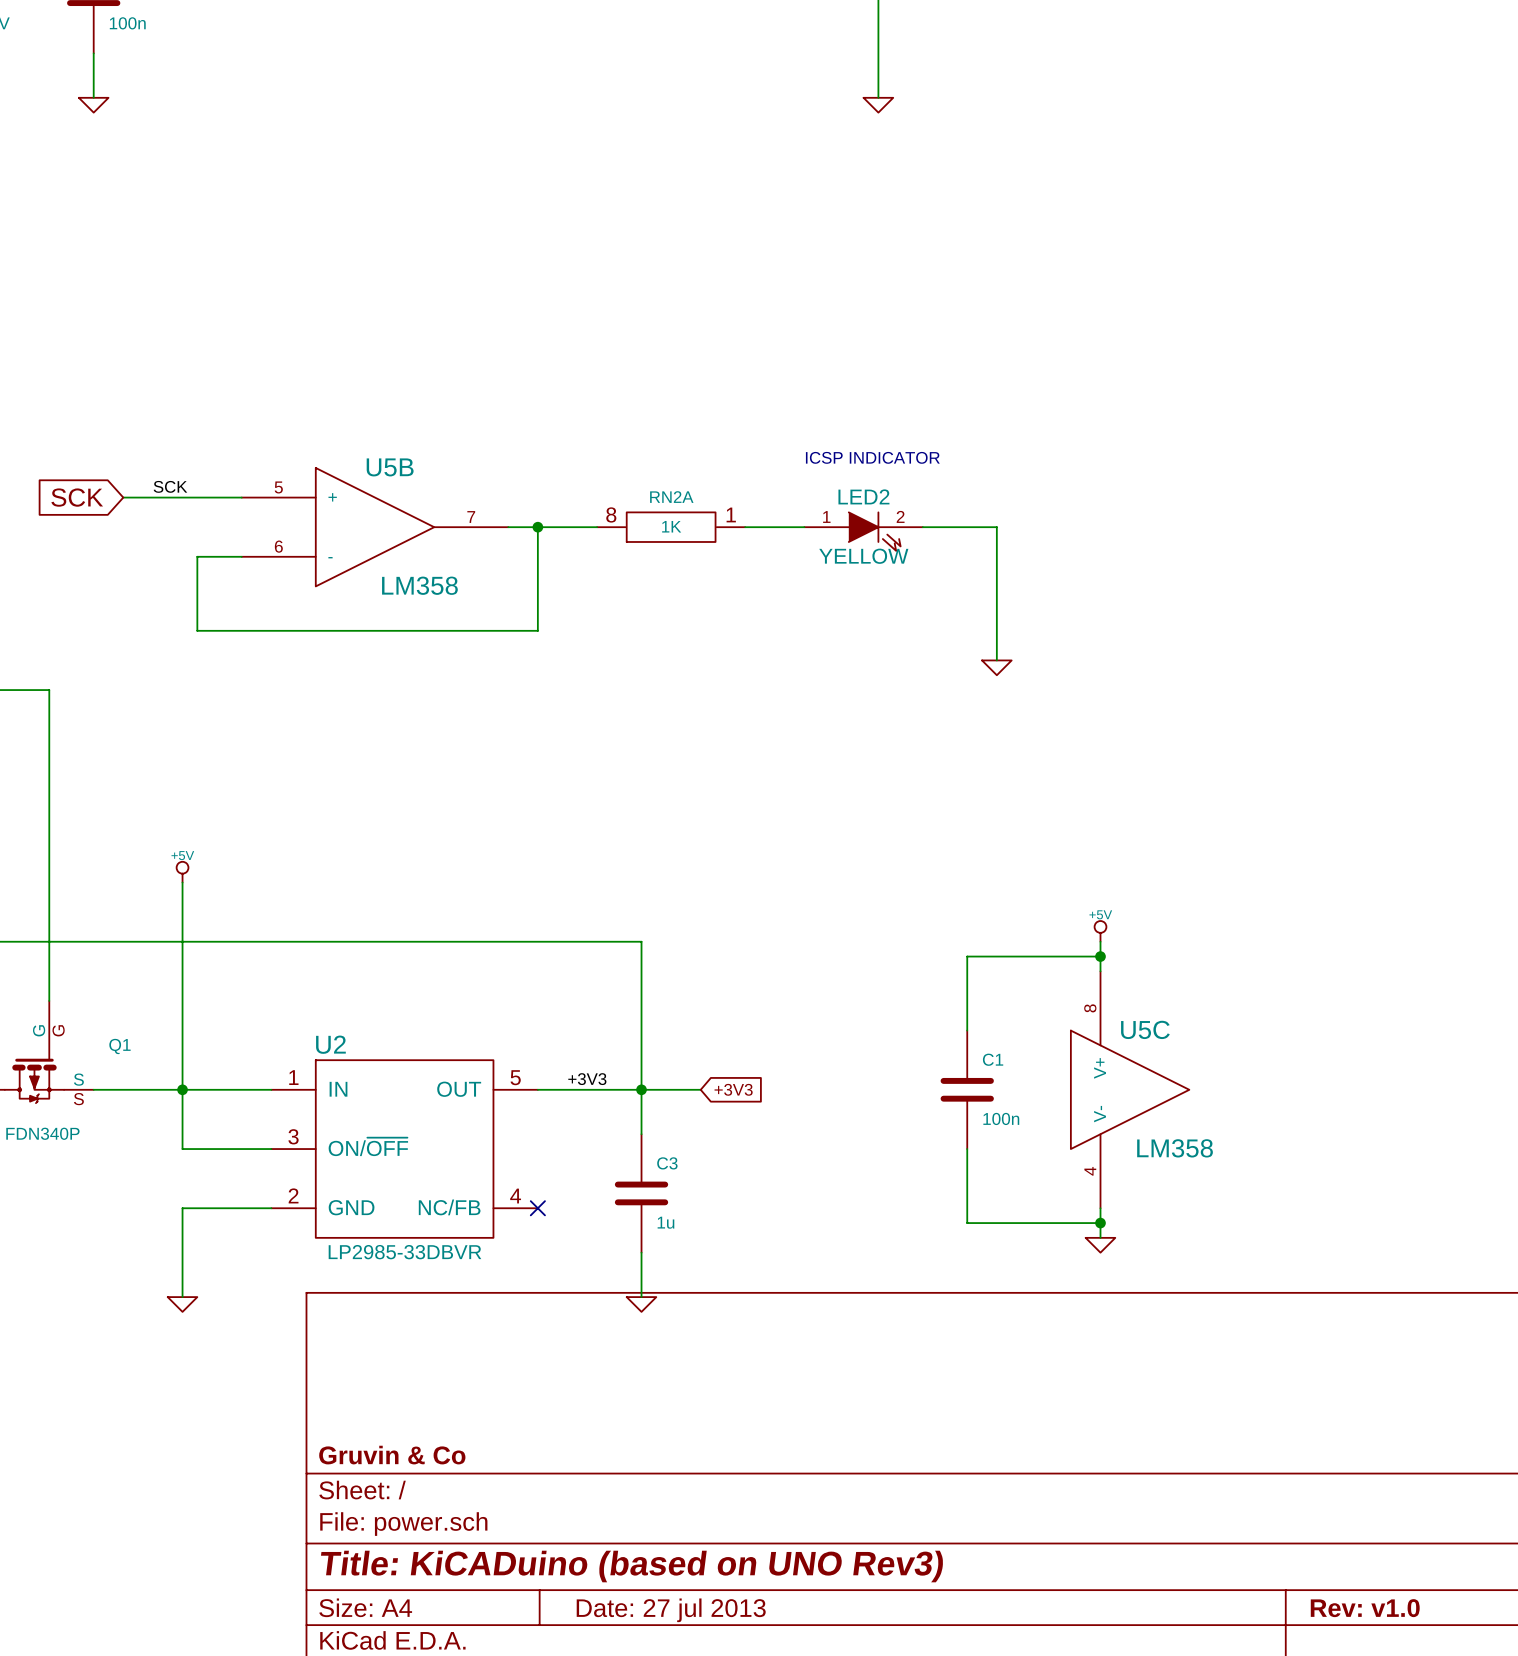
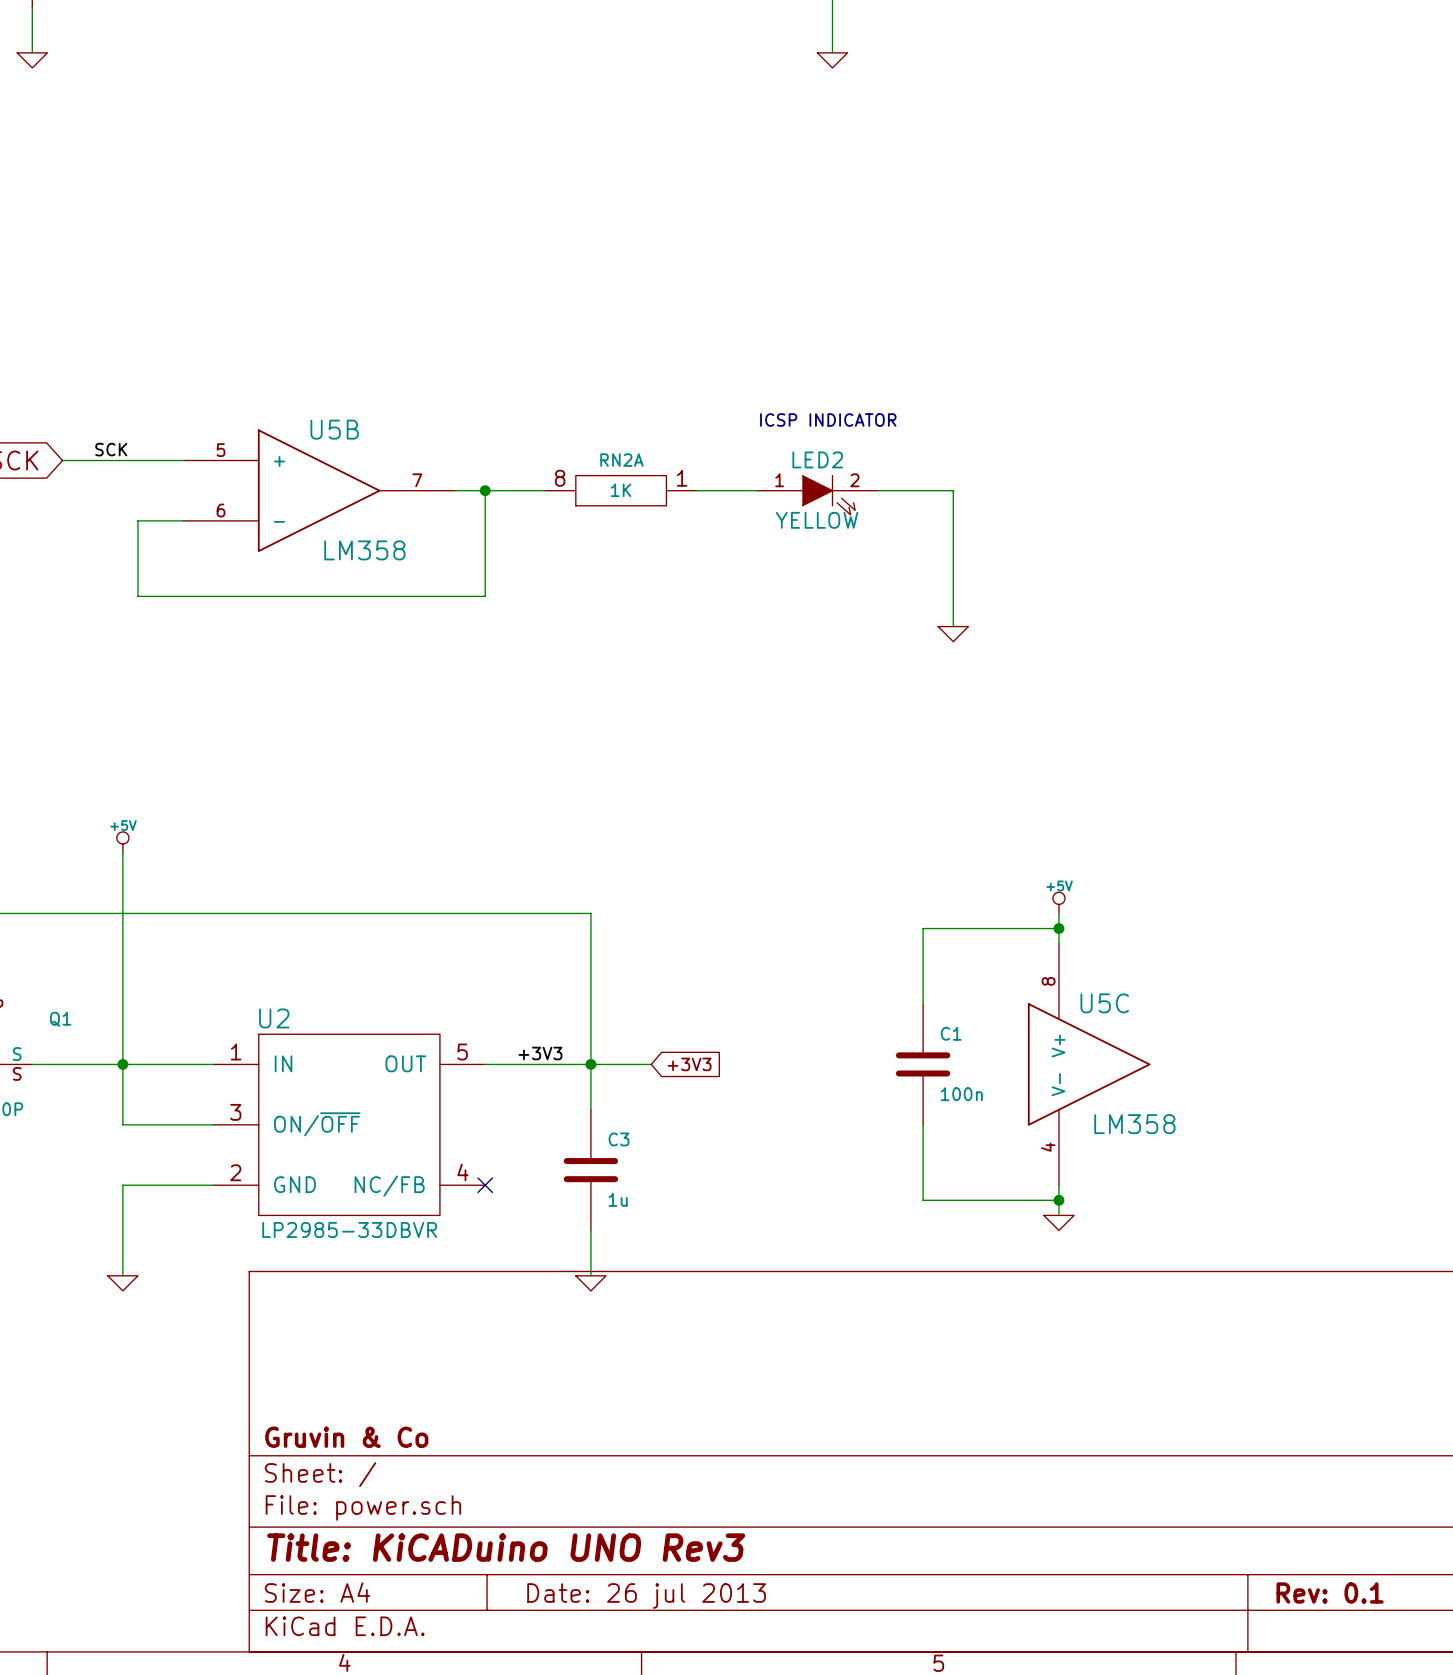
title block: Title: KiCADuino (based on UNO Rev3) (632, 1566) -> Title: KiCADuino UNO Rev3 (506, 1547)
title block: Rev: v1.0 (1365, 1608) -> Rev: 0.1 (1330, 1593)
title block: Date: 27 jul 2013 (671, 1610) -> Date: 26 jul 2013 (646, 1595)

